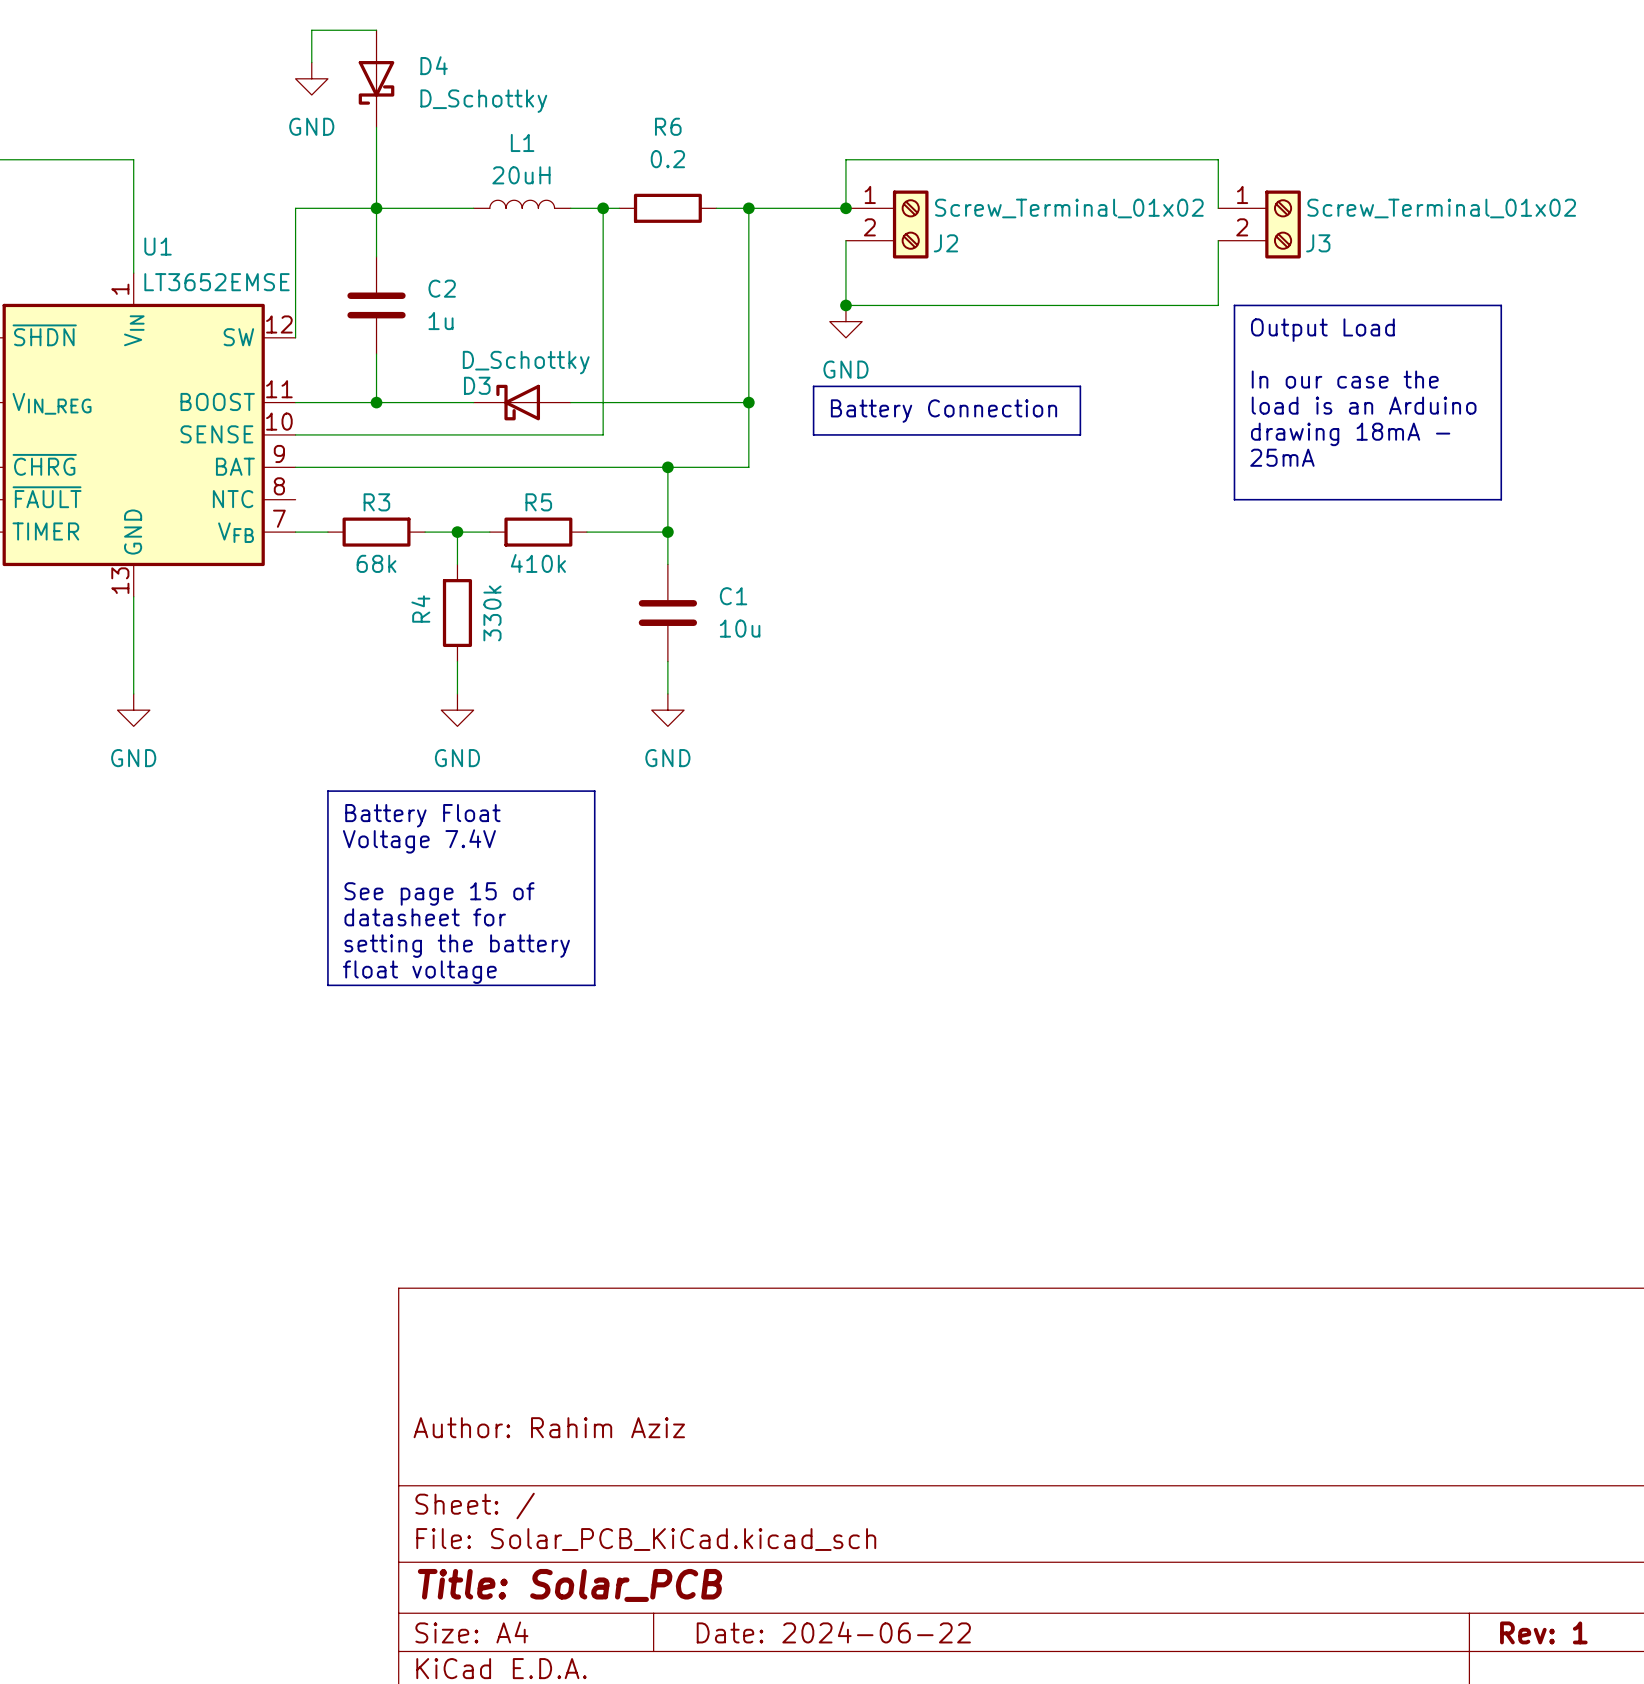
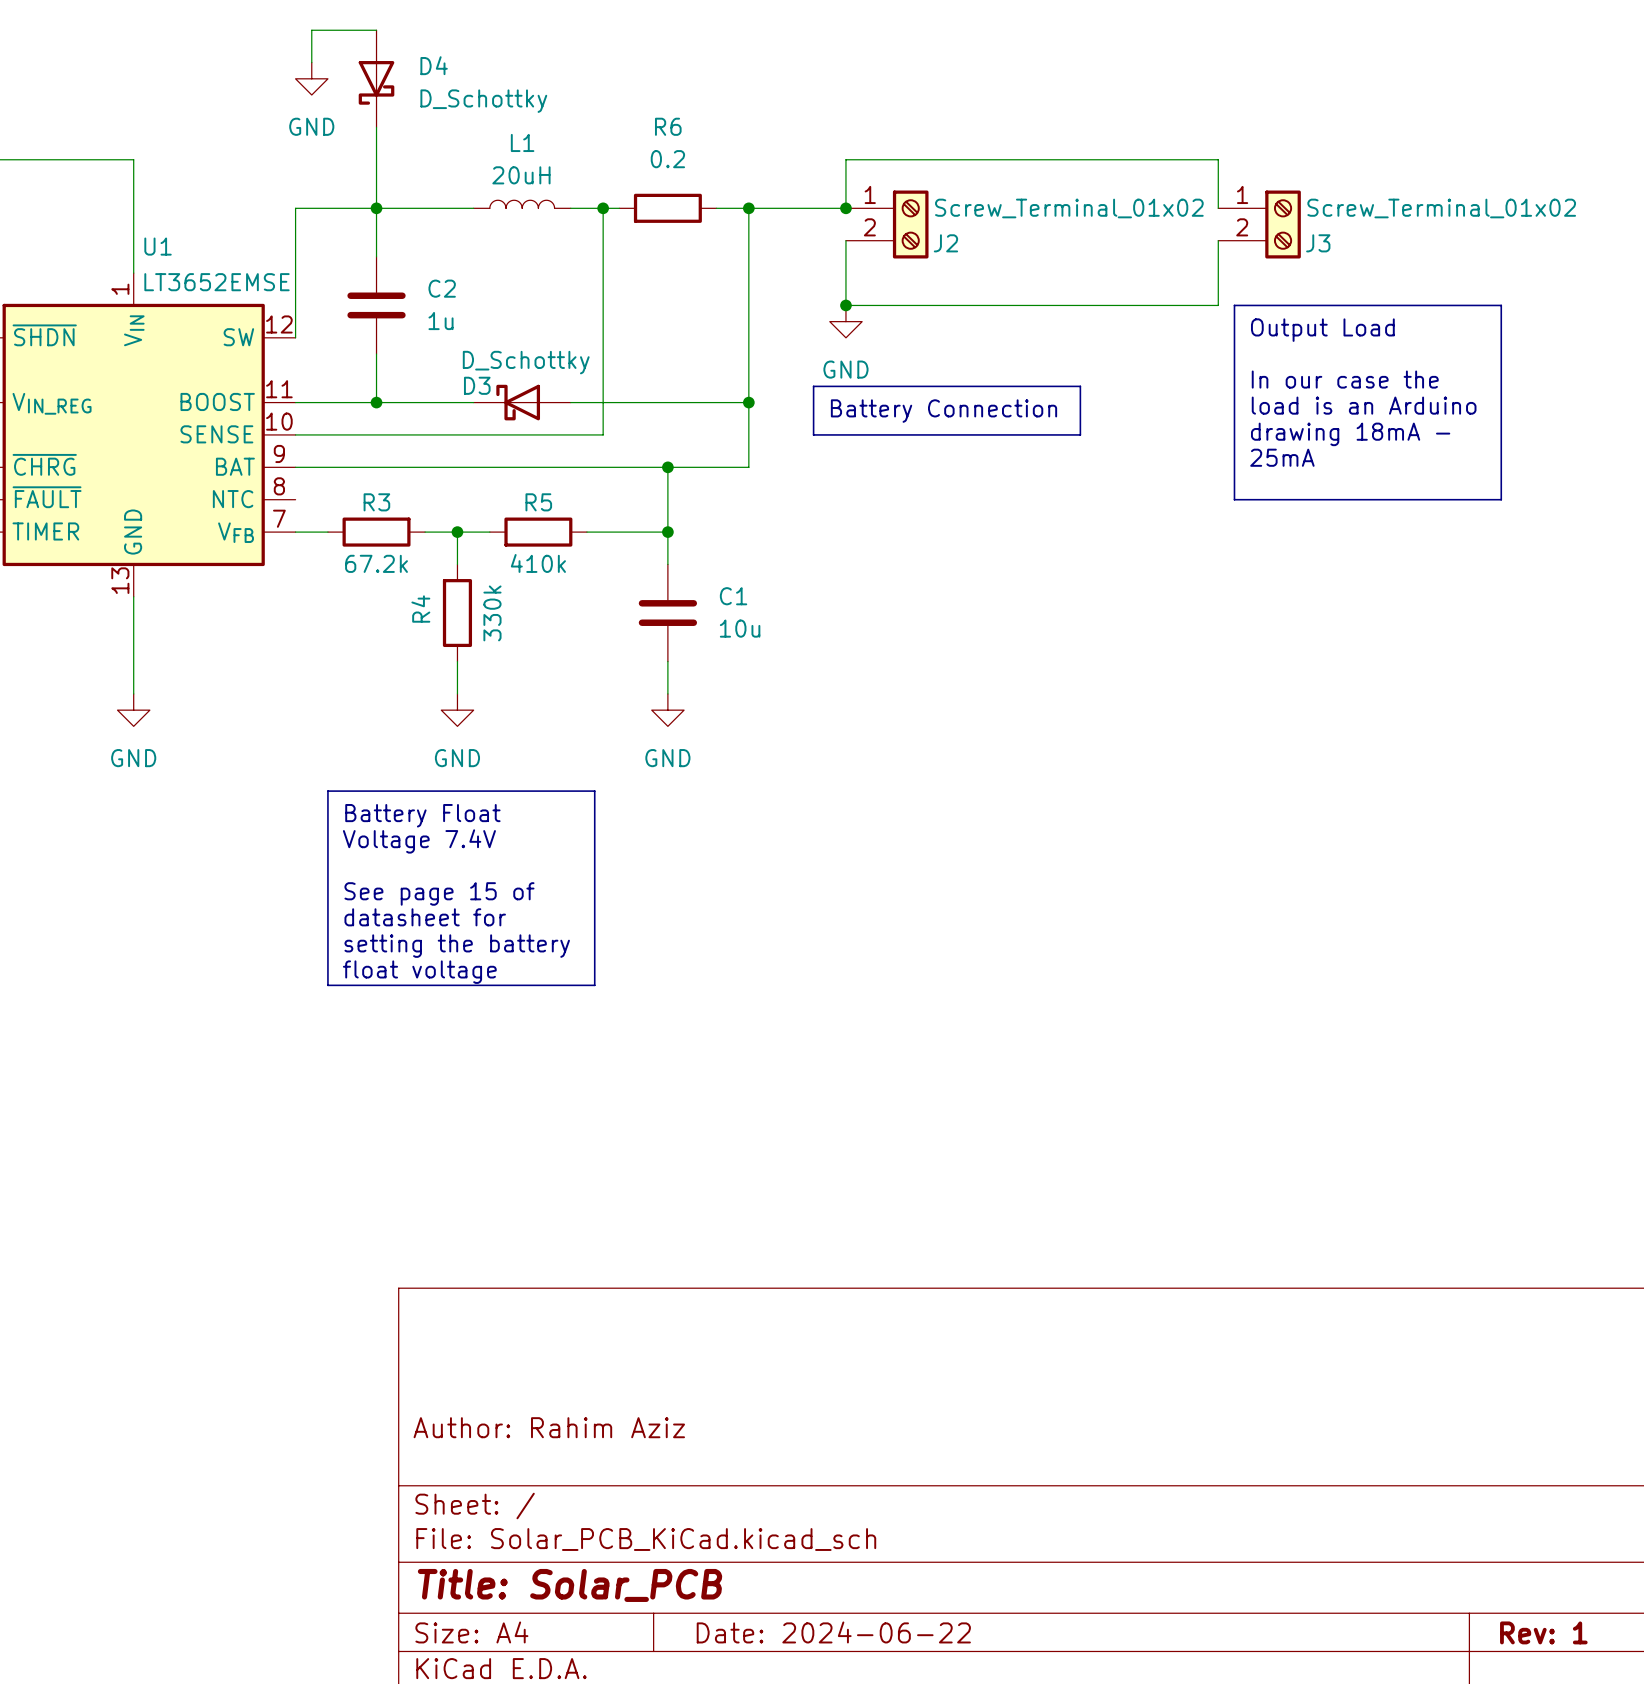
R3 value: 68k (376, 563) -> 67.2k (376, 563)

